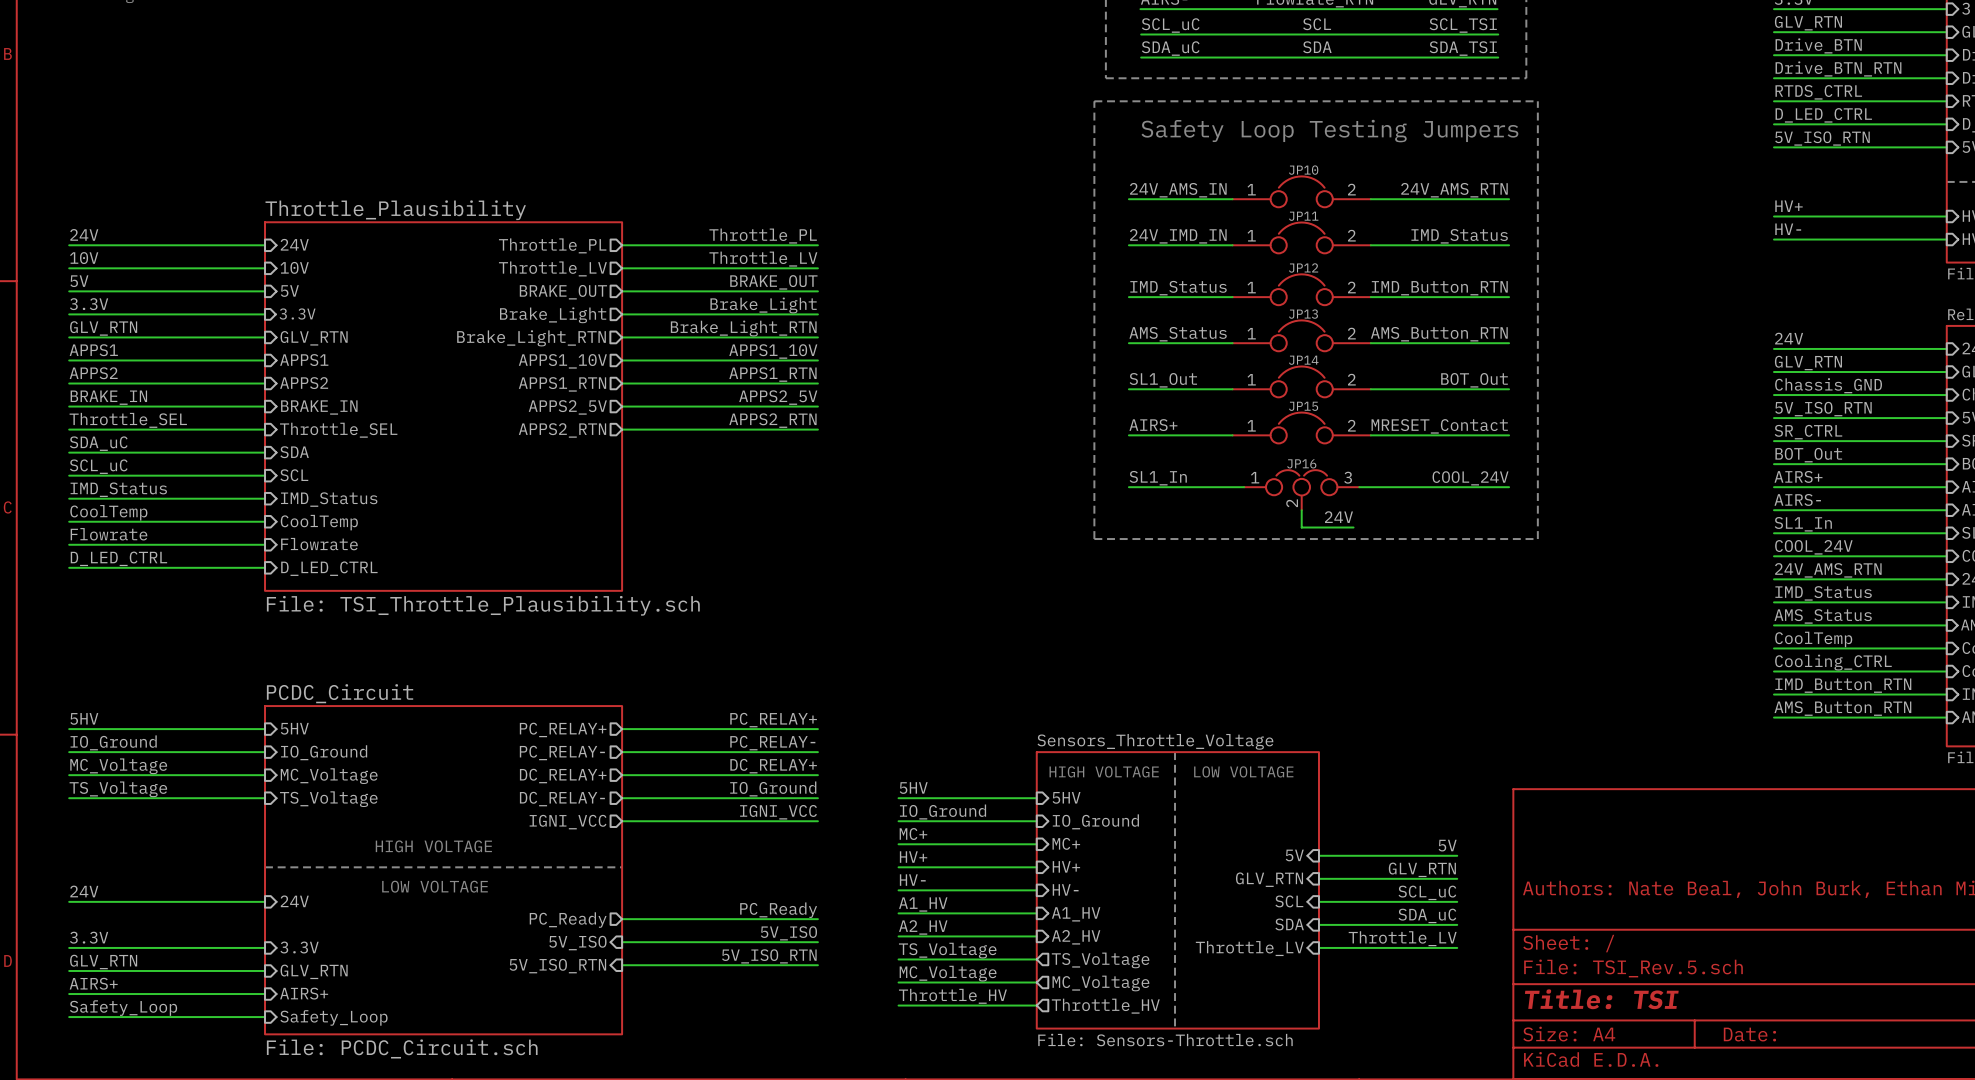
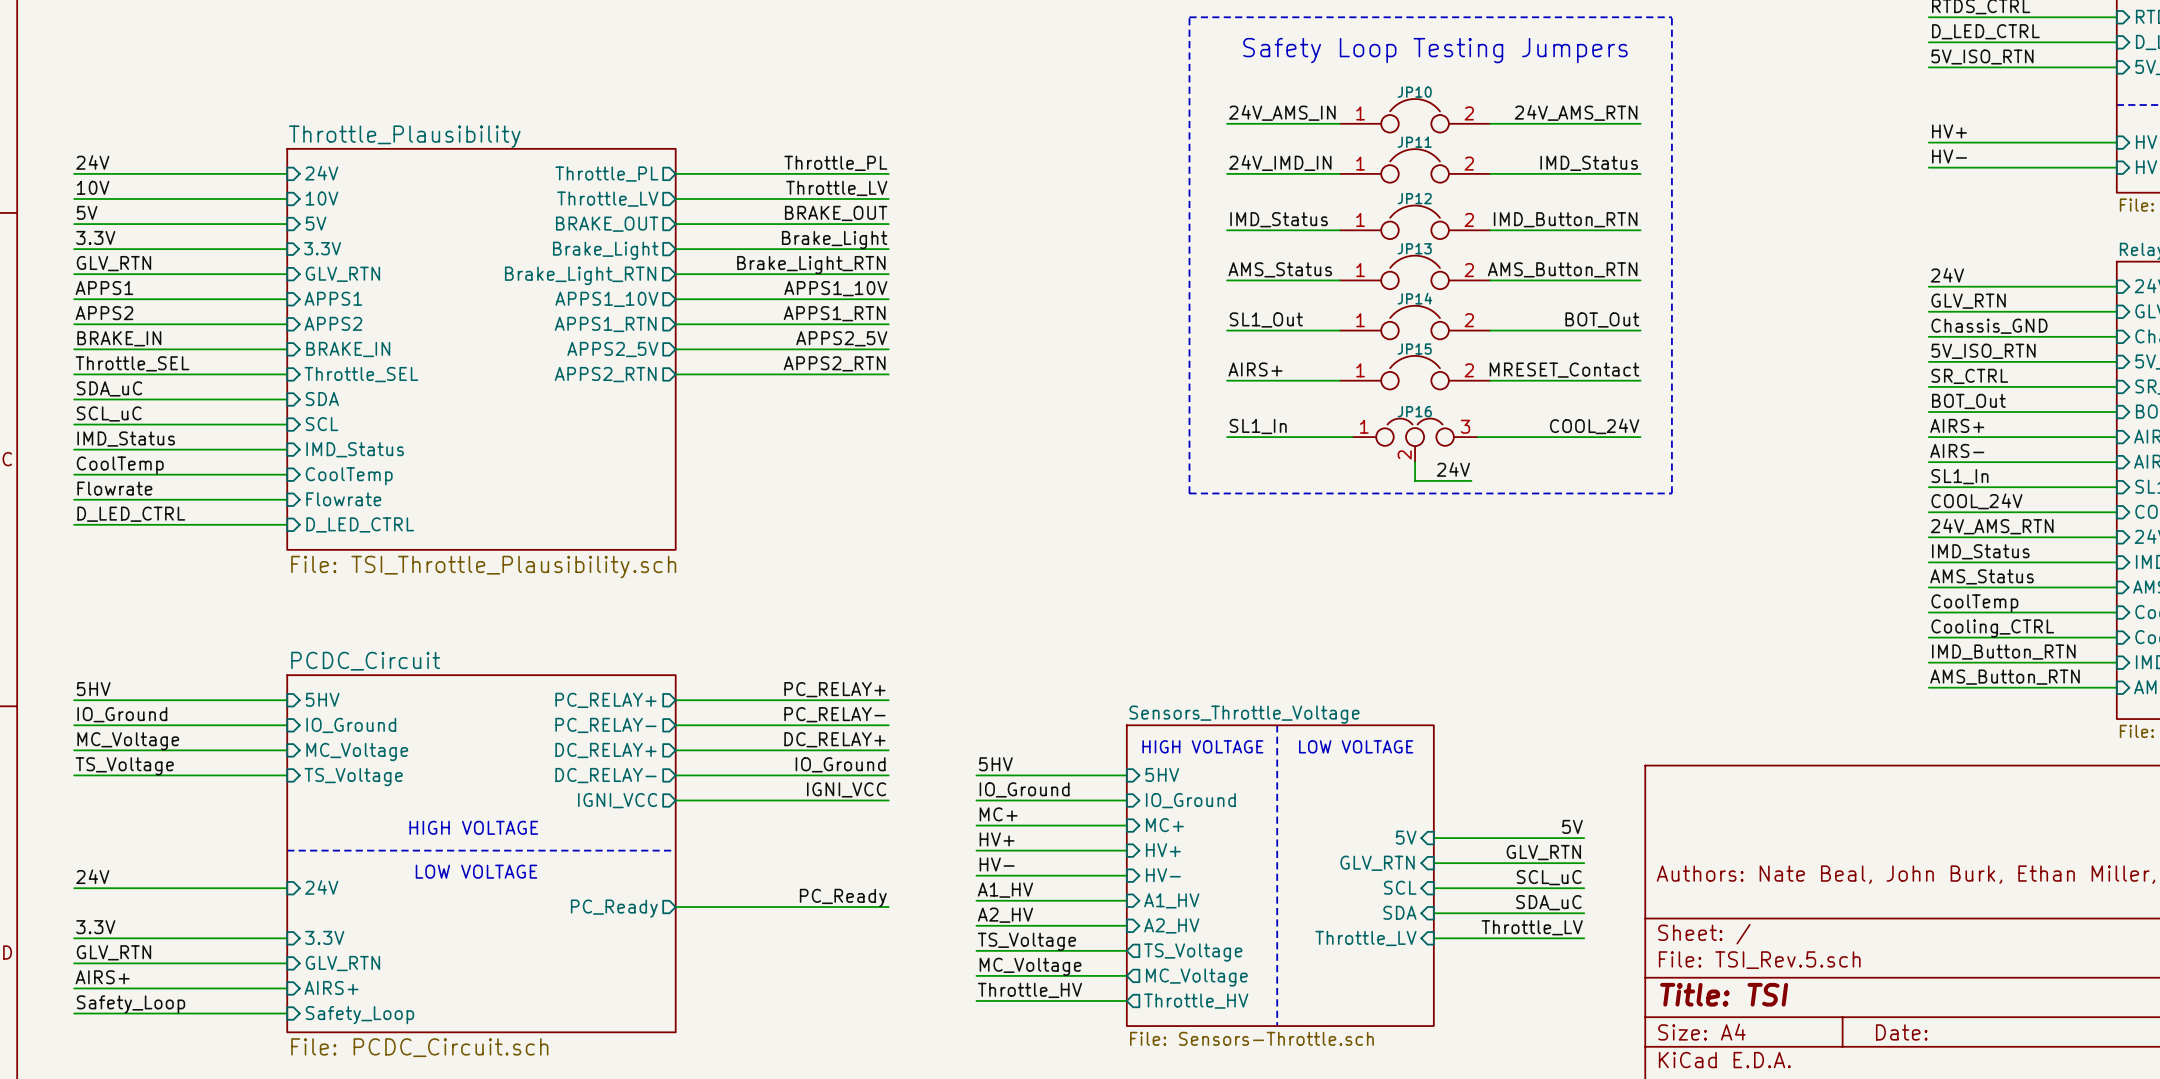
label: 5V_ISO (788, 933) -> none
wire: (622, 942) (817, 942) -> none
sheet pin: 5V_ISO (577, 943) -> none
label: 5V_ISO_RTN (769, 956) -> none
wire: (622, 965) (817, 965) -> none
sheet pin: 5V_ISO_RTN (557, 966) -> none

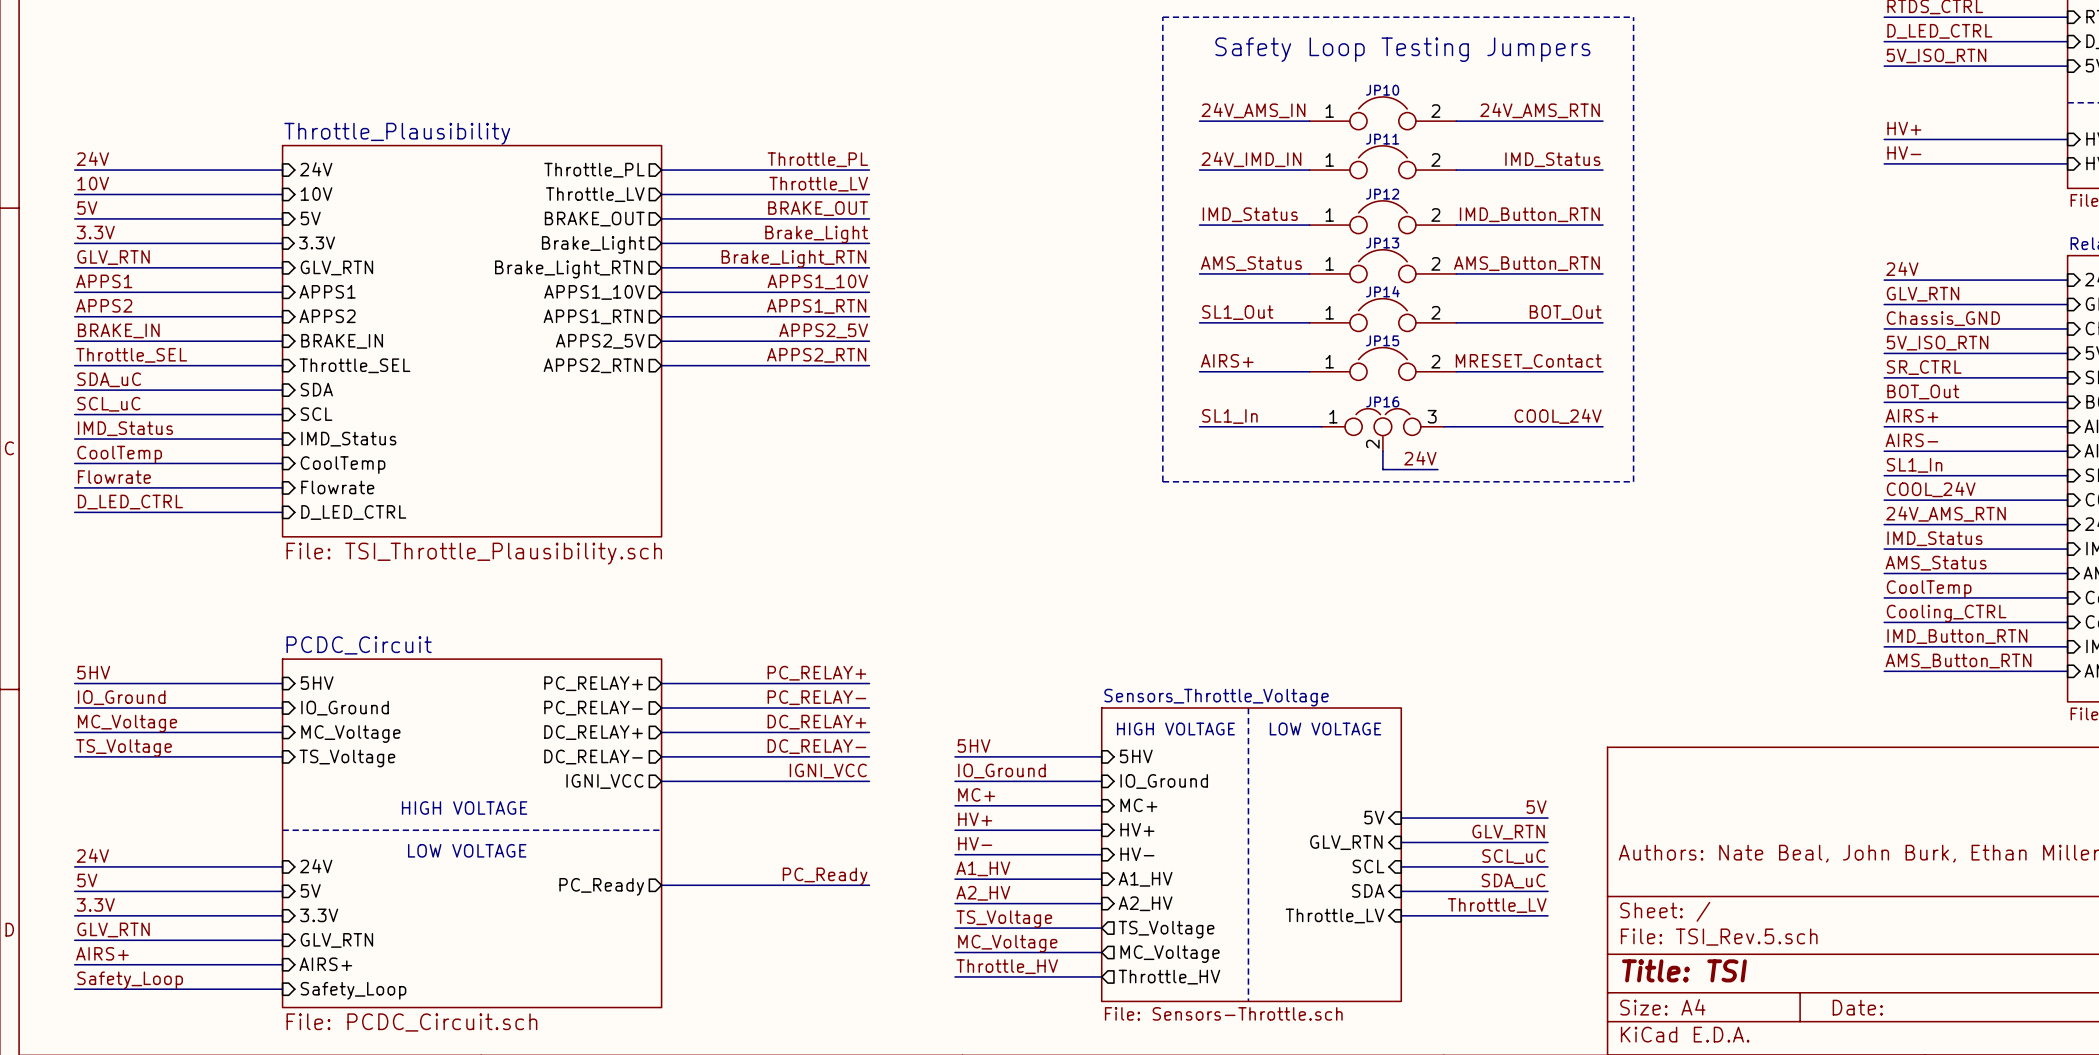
label: IO_Ground (840, 764) -> DC_RELAY- (816, 746)
label: none -> 5V (87, 880)
sheet pin: none -> 5V (310, 890)
wire: none -> (74, 891) (282, 891)

